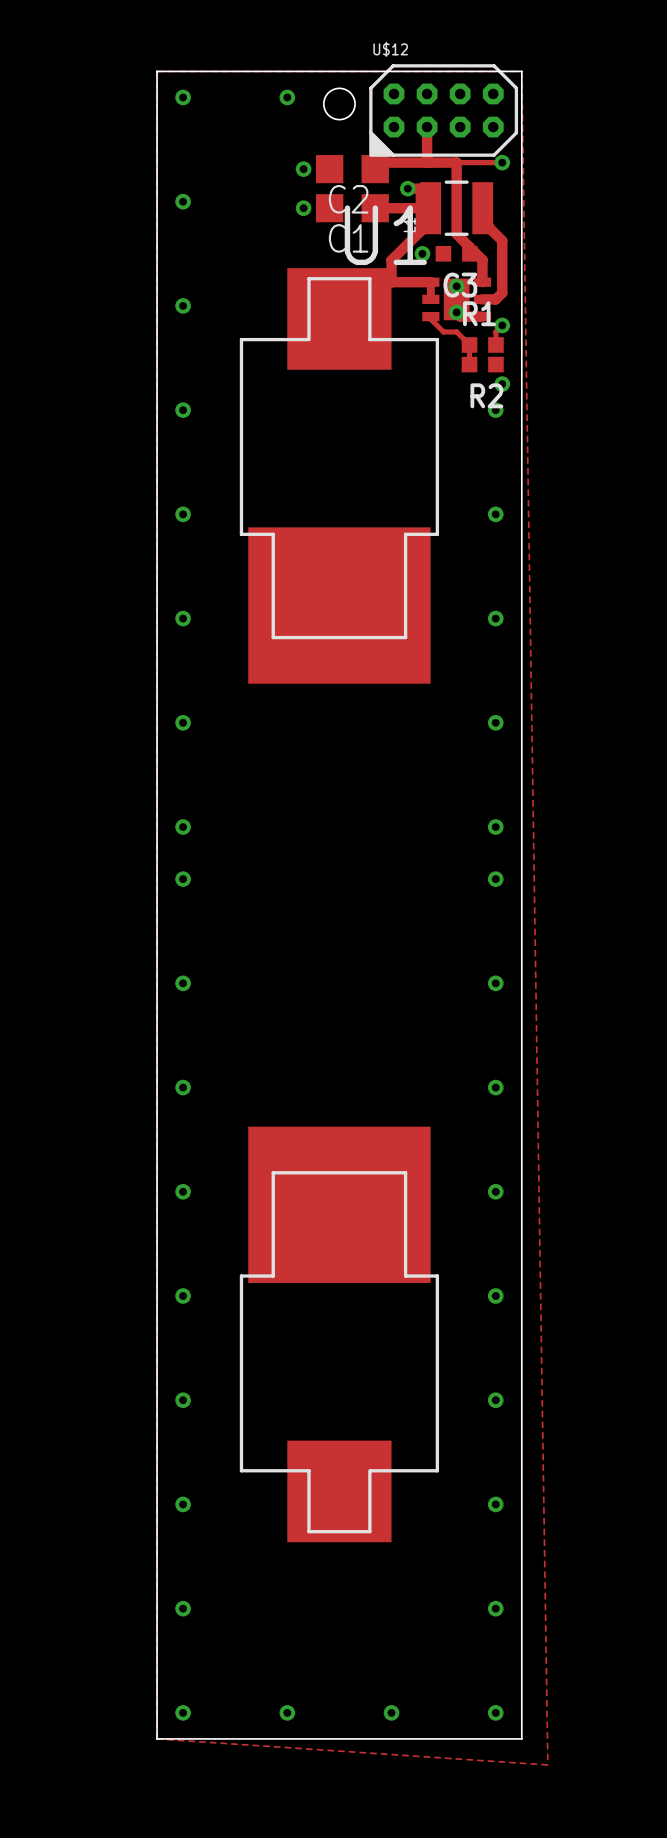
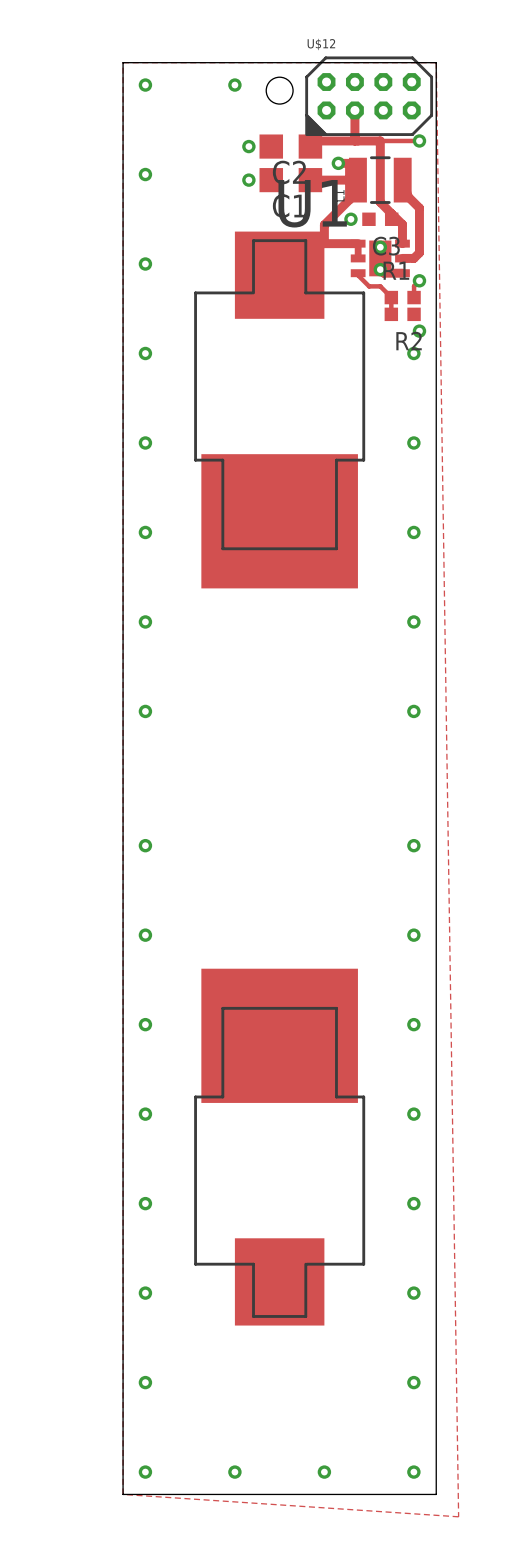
via: (183, 879) -> none
via: (495, 879) -> none

